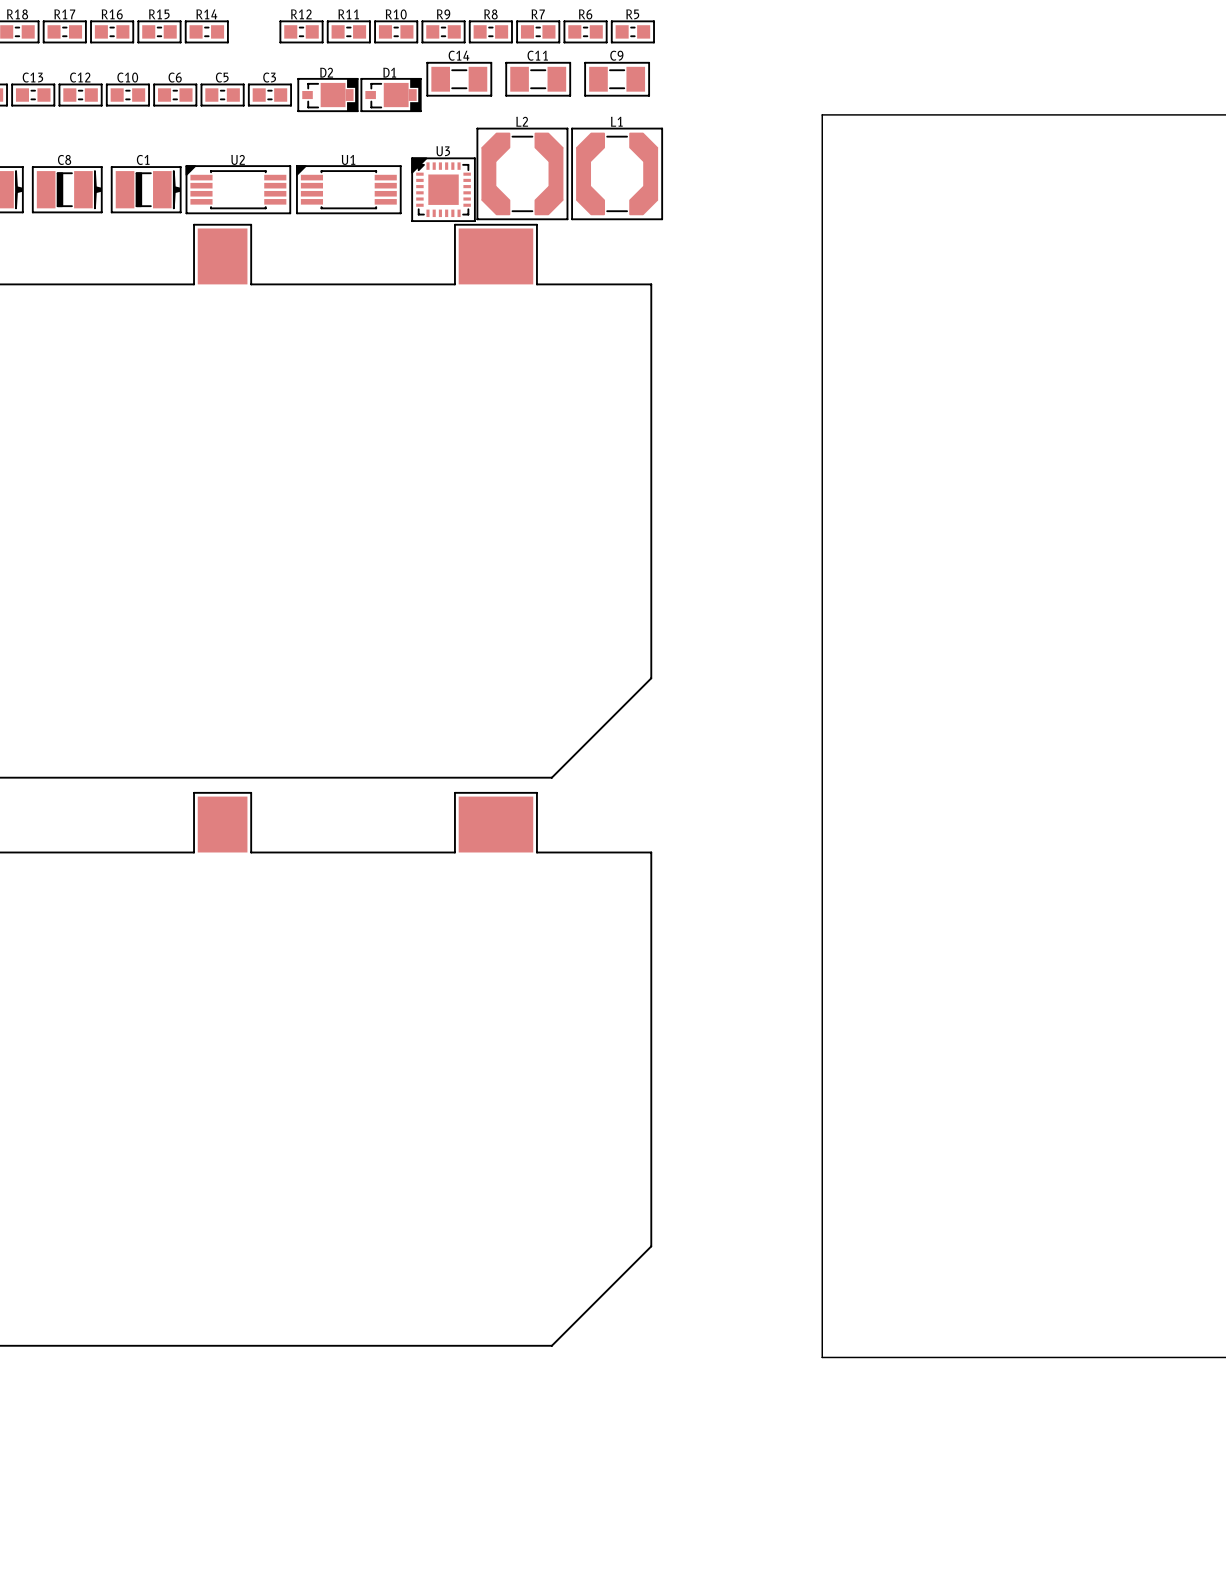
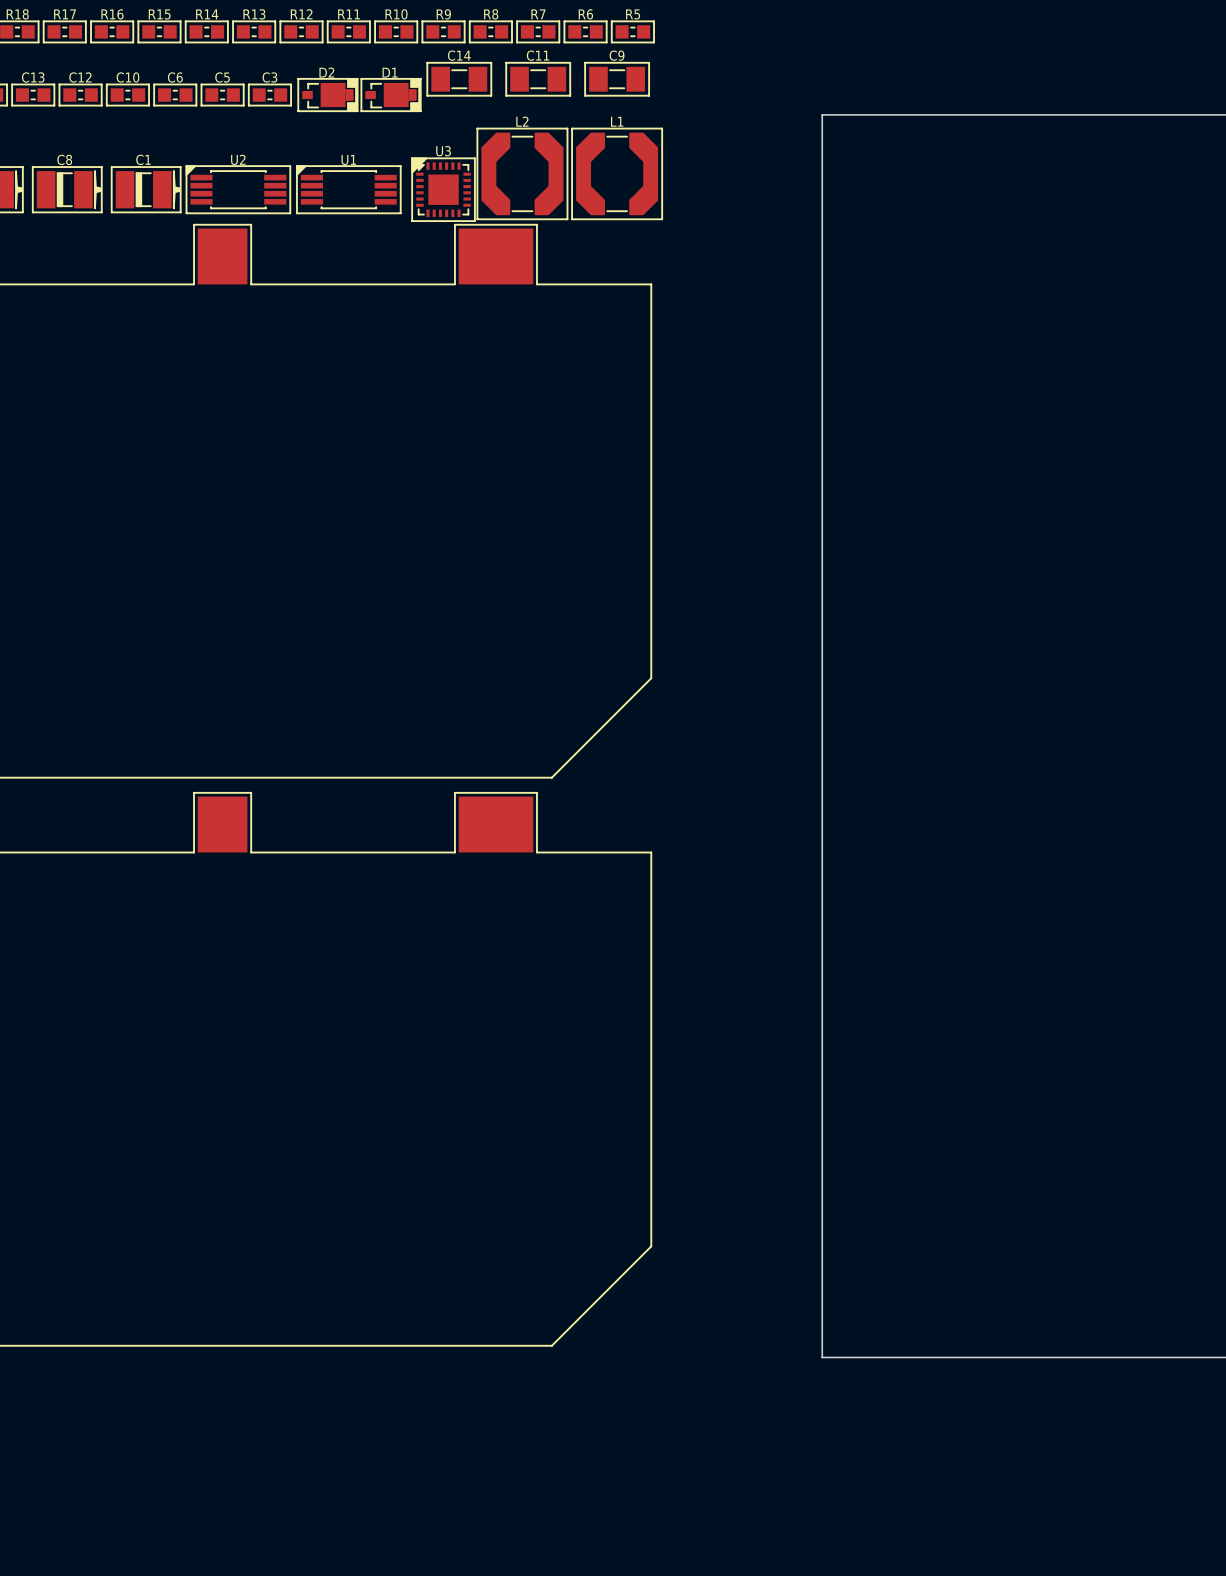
R13: none -> (254, 31)

